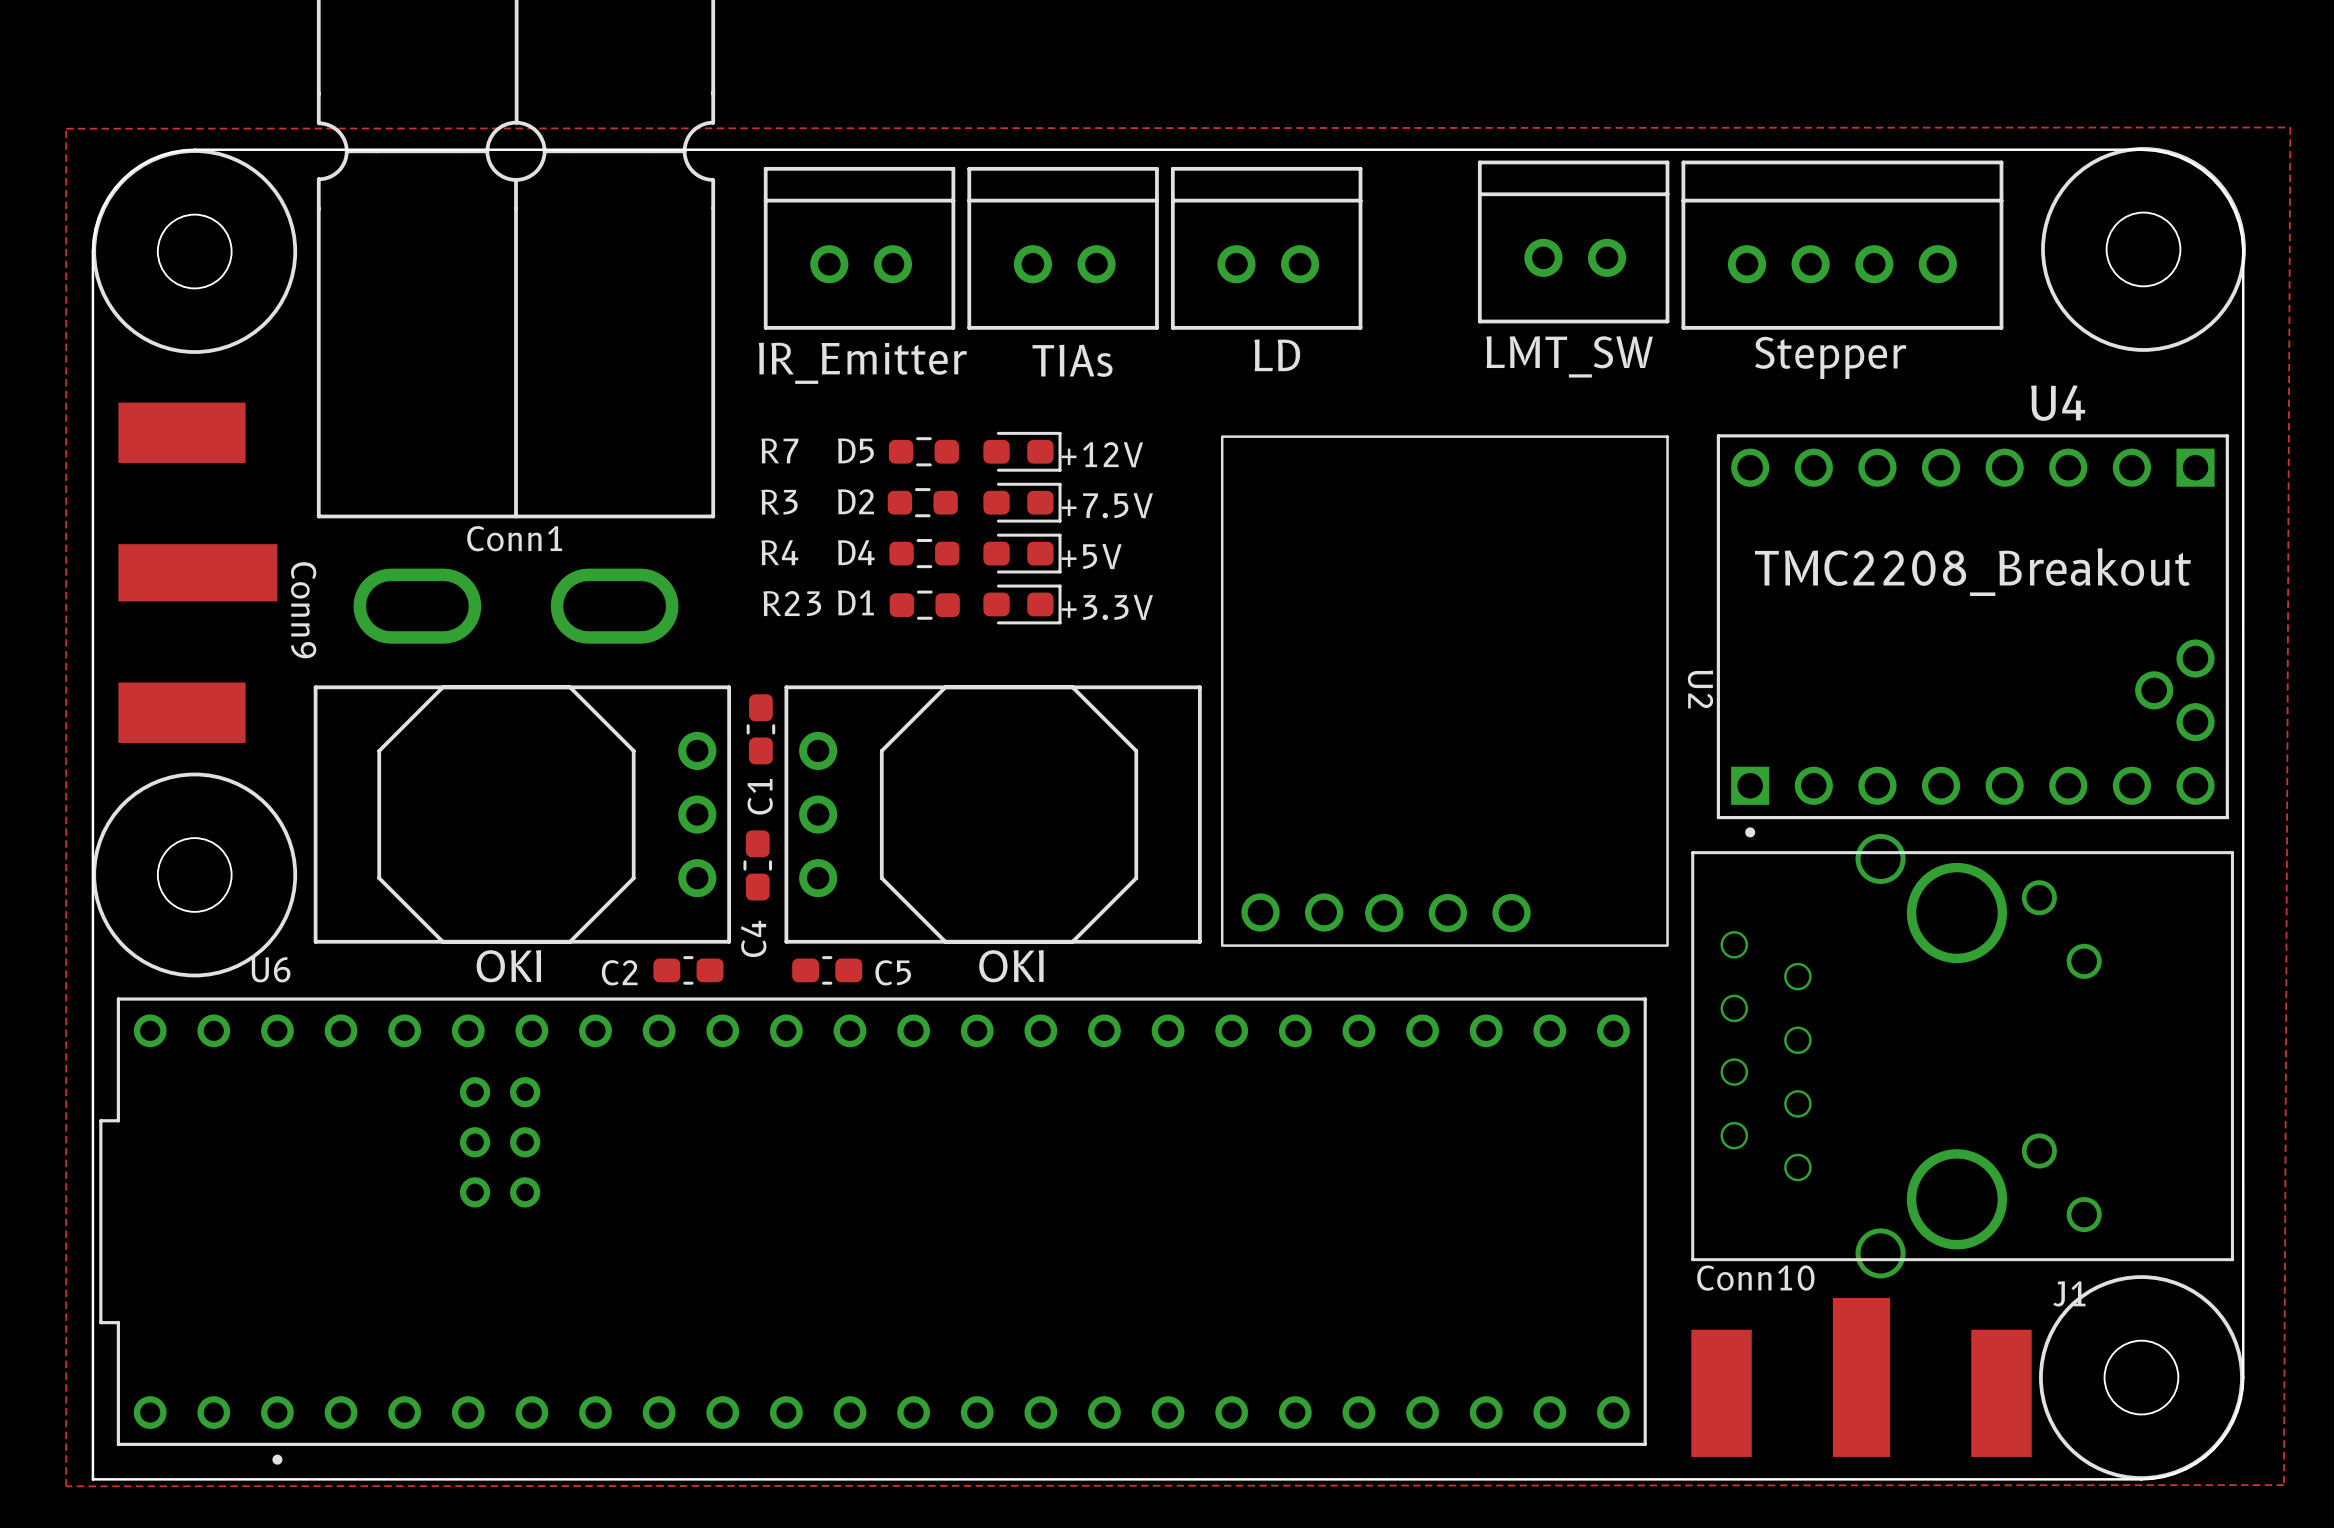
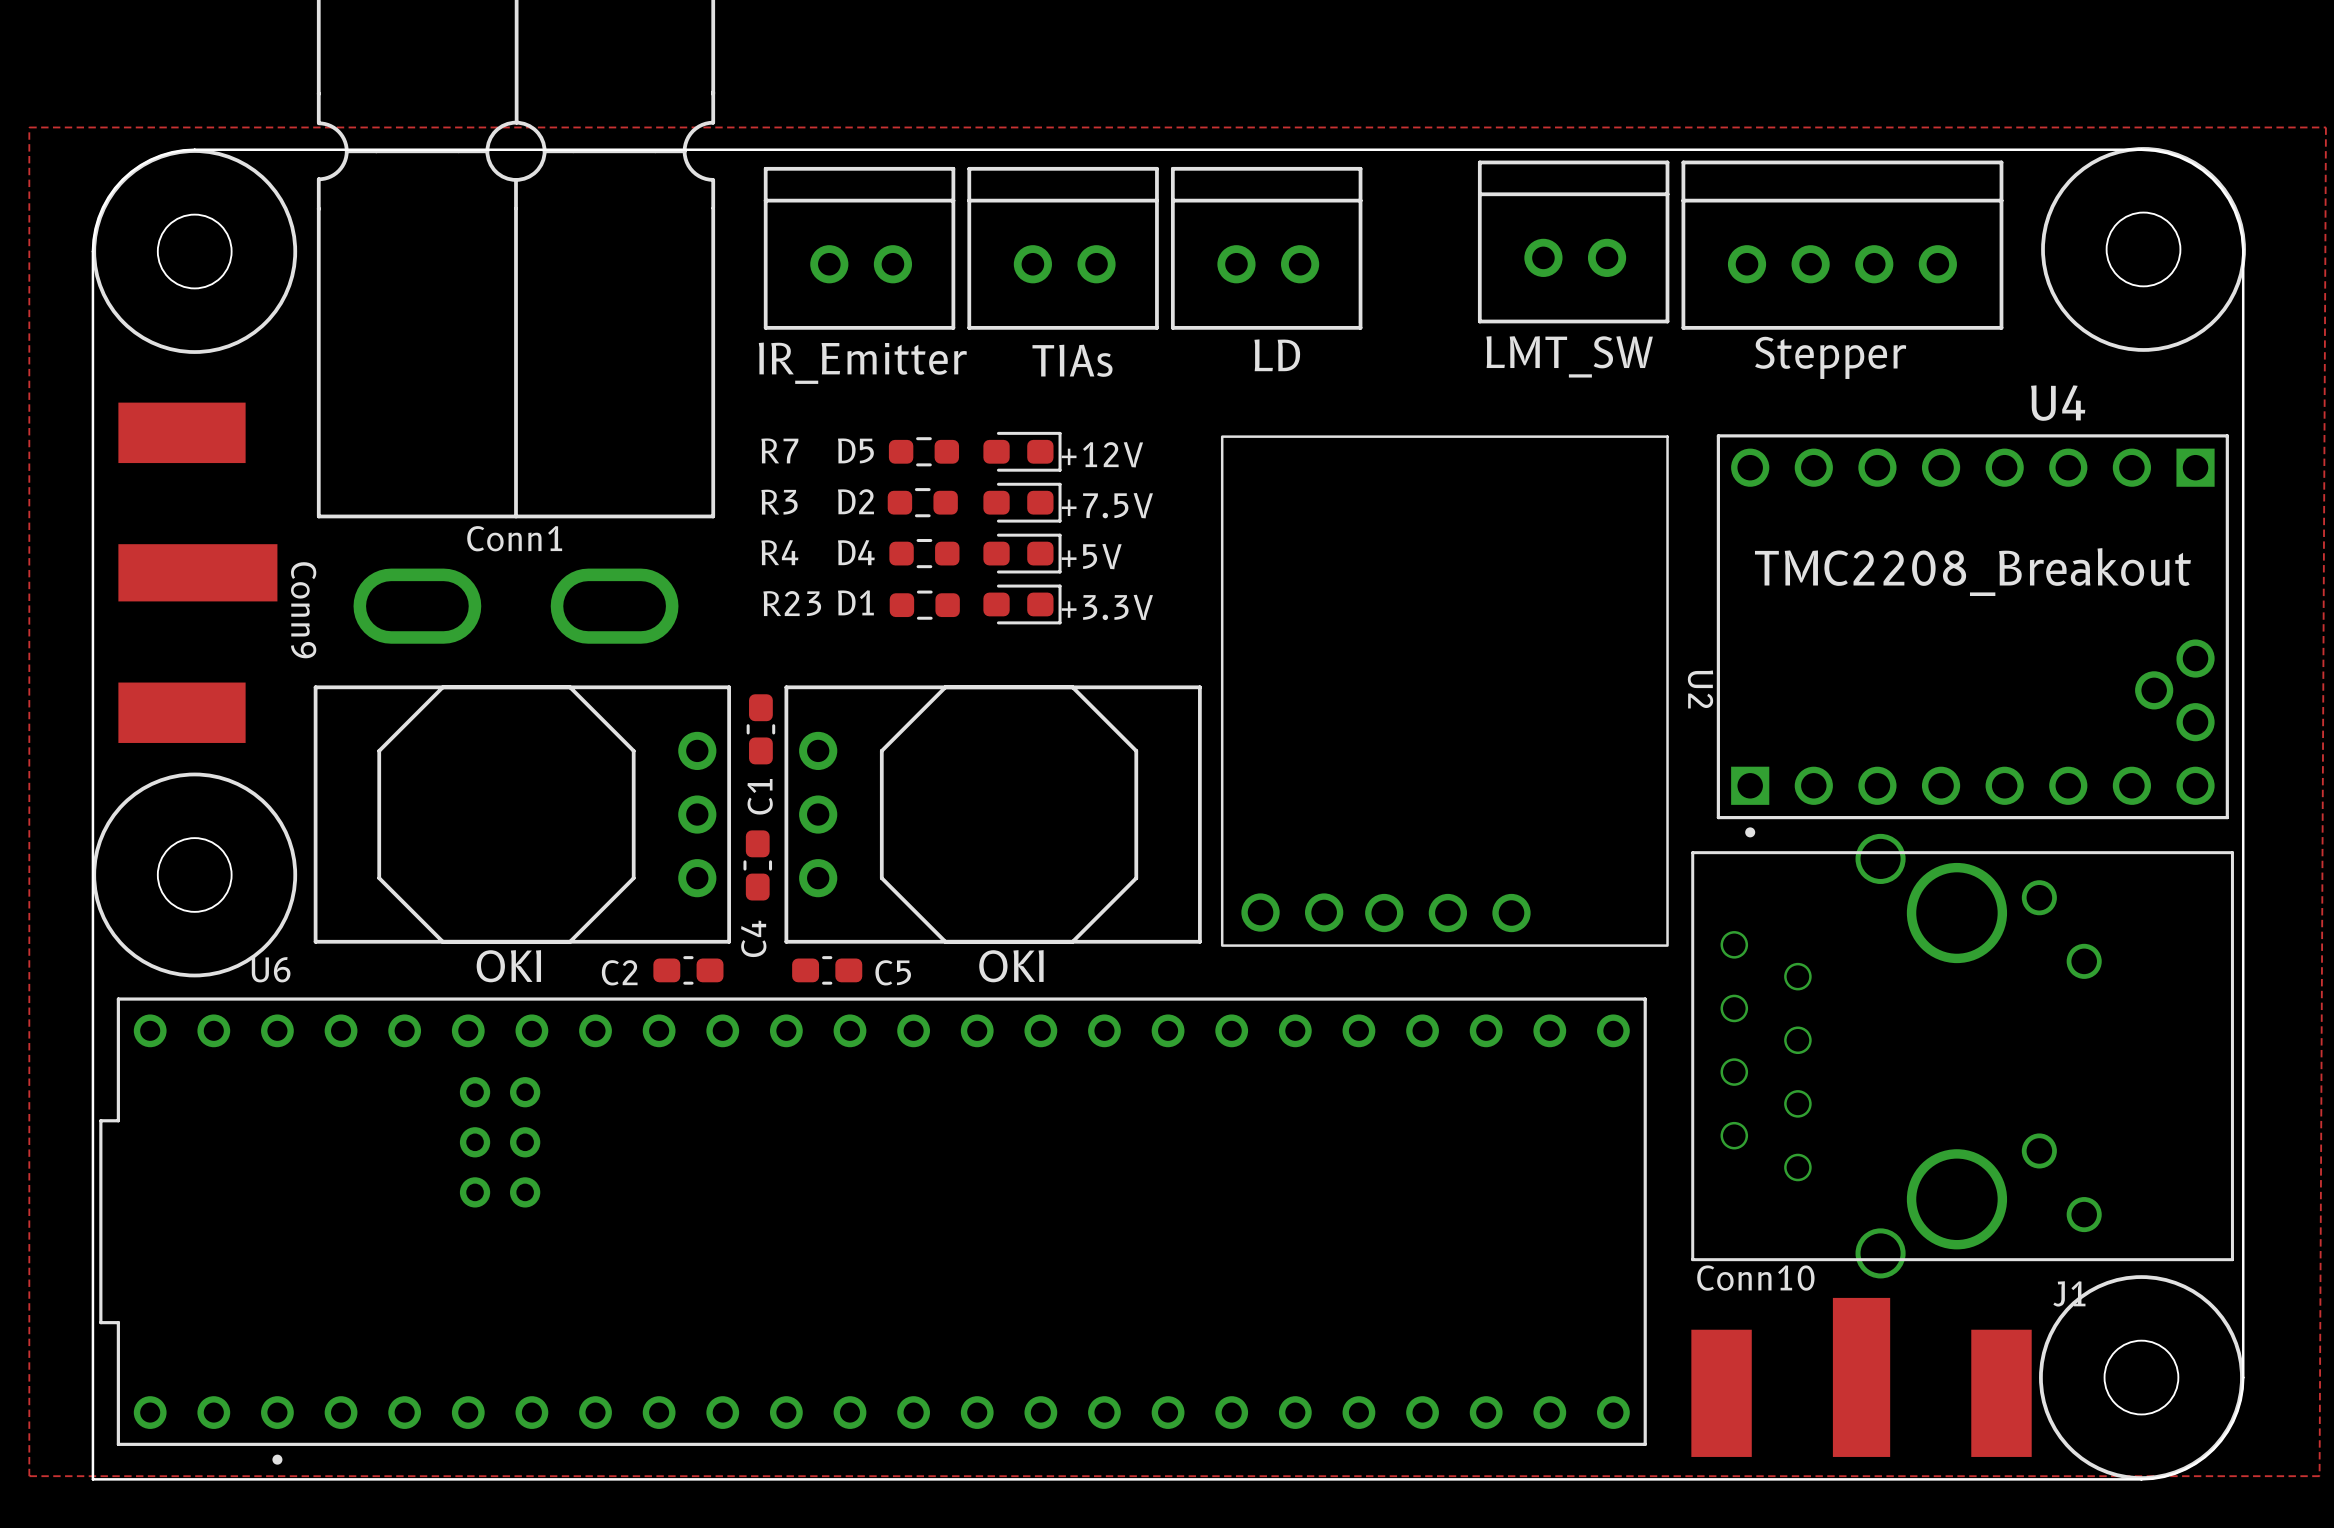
zone outline: (2290, 127) (66, 128) (66, 1486) (2283, 1485) (2290, 127) -> (29, 127) (29, 1476) (2319, 1476) (2325, 127) (29, 127)

